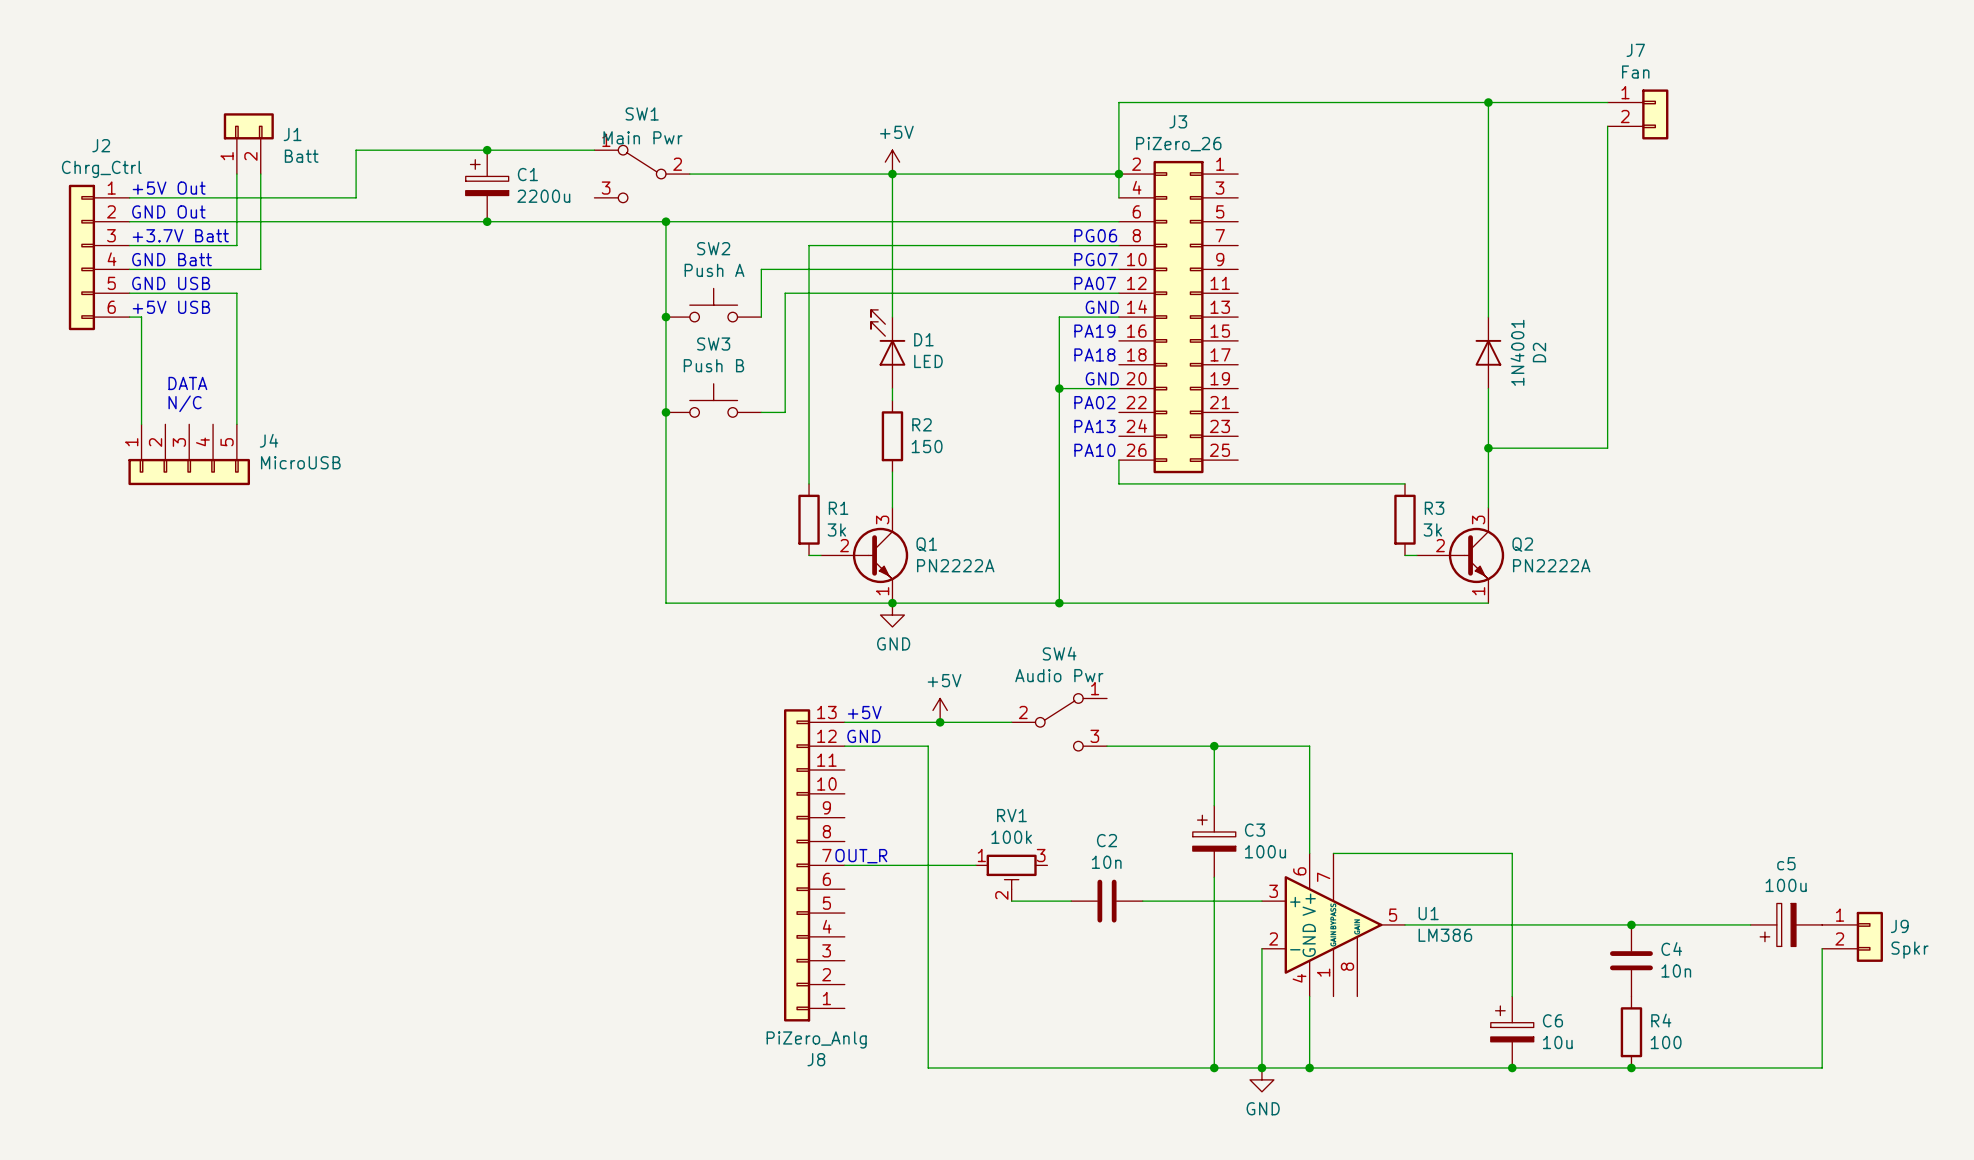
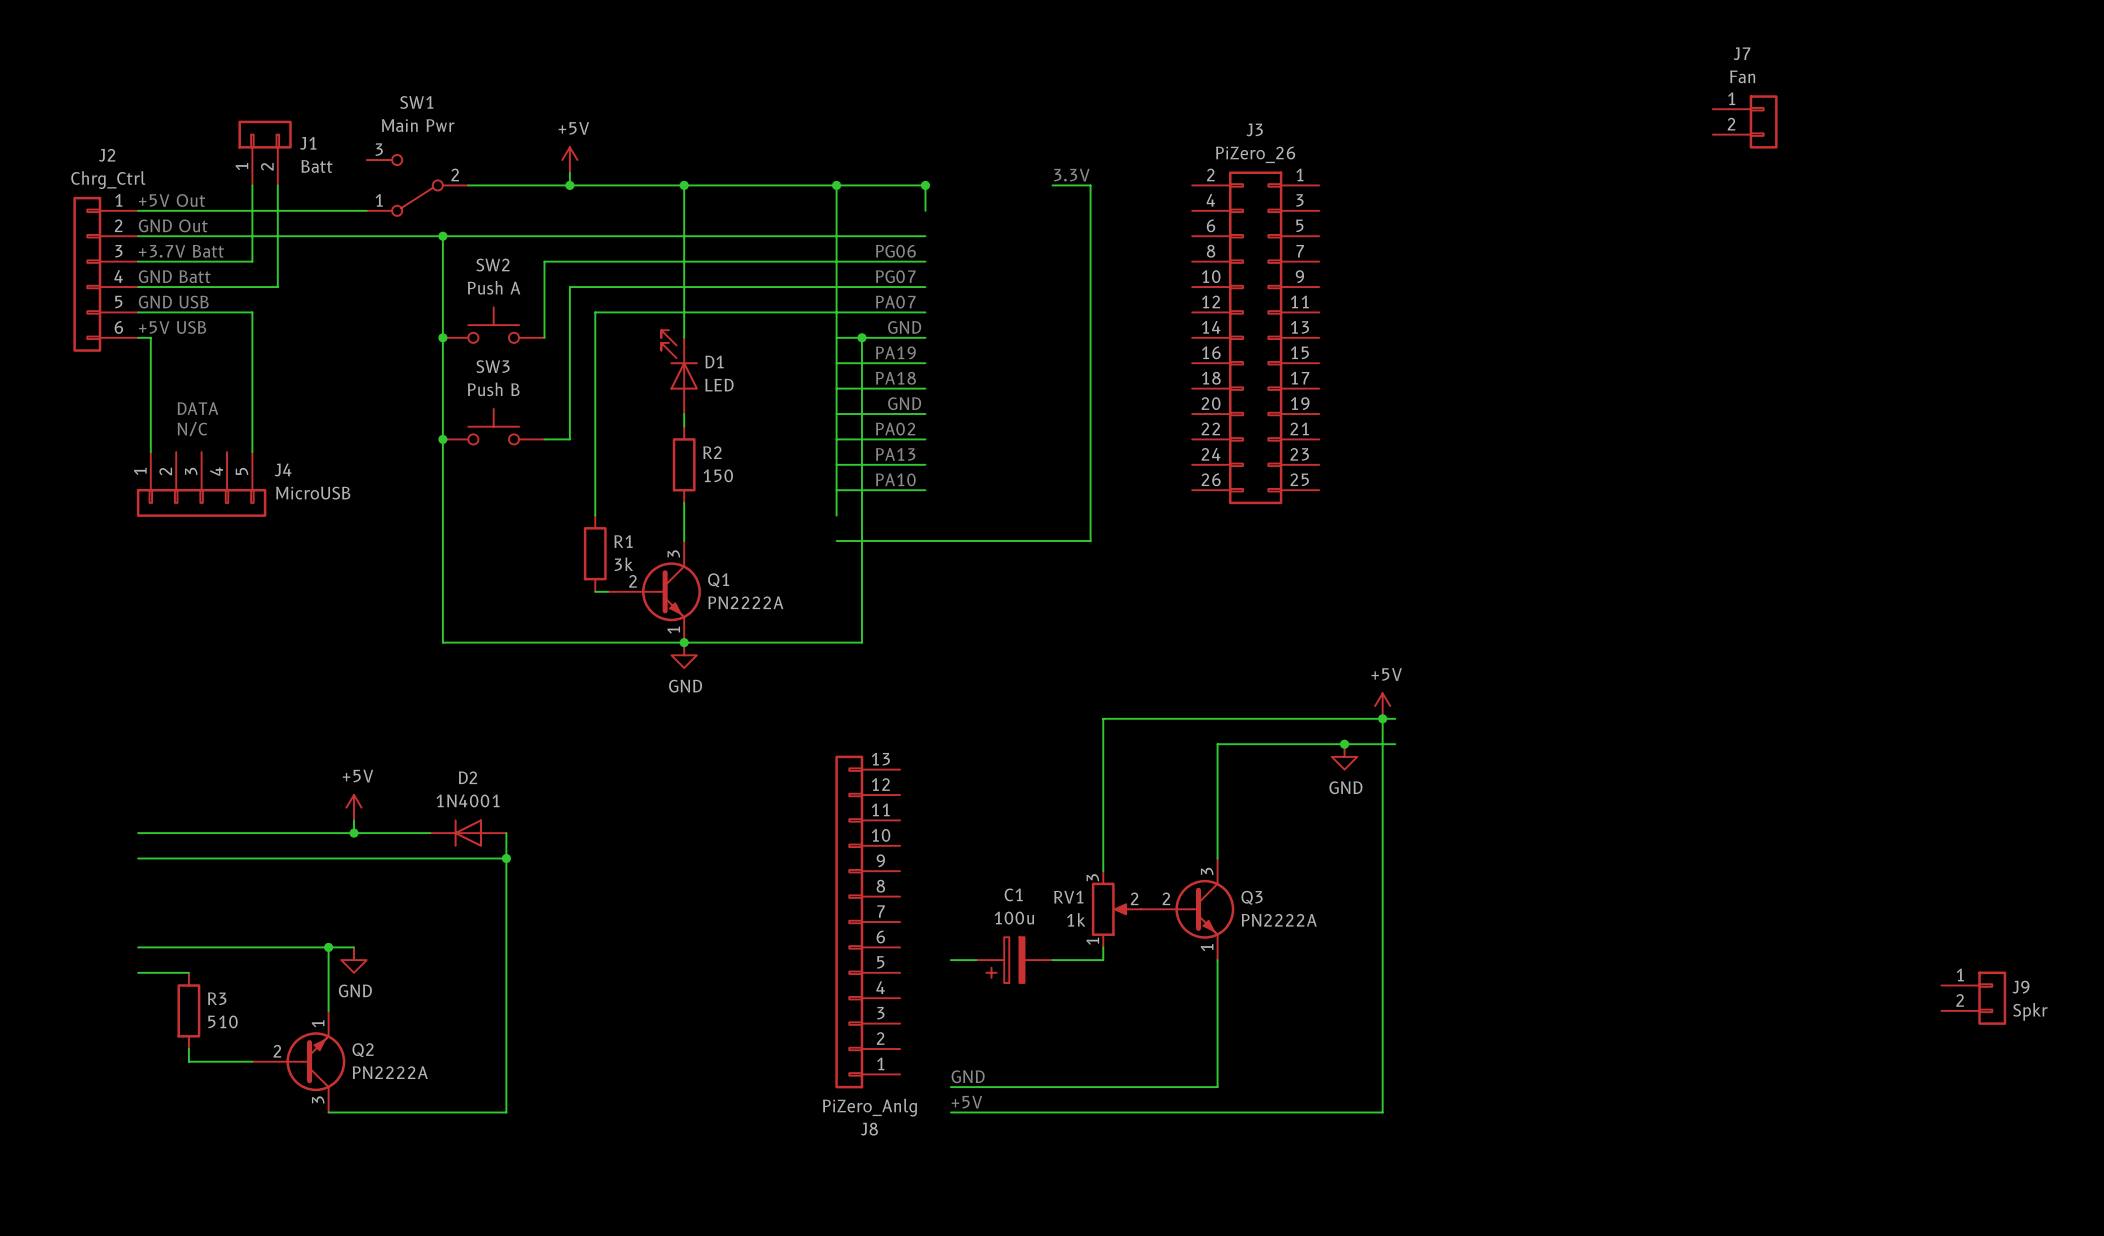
wire: (1488, 102) (1488, 317) -> none
junction: (1488, 102) -> none
wire: (1607, 102) (1118, 102) (1118, 197) -> none
wire: (1607, 126) (1607, 448) (1488, 448) -> none
SW1 value position: Main Pwr (643, 137) -> Main Pwr (418, 125)
junction: (487, 150) -> none
power symbol: none -> +5V (569, 160)
wire: (594, 150) (356, 150) (356, 197) (344, 197) -> none
wire: none -> (569, 172) (569, 185)
power symbol: +5V (892, 162) -> none
text: none -> 3.3V (1071, 175)
wire: none -> (468, 185) (734, 185)
C1 name position: C1 (527, 174) -> C1 (1013, 894)
junction: none -> (569, 185)
wire: none -> (684, 185) (684, 337)
SW1 flip: as is (642, 174) -> up-down (417, 185)
SW1 position: (642, 174) -> (417, 185)
wire: none -> (836, 185) (836, 312) (595, 312) (595, 515)
junction: none -> (836, 185)
wire: (868, 174) (987, 174) -> (925, 185) (925, 210)
wire: (892, 174) (892, 317) -> none
junction position: (892, 174) -> (925, 185)
wire: (1023, 174) (1118, 174) -> (1090, 185) (1090, 541) (836, 541)
junction: (1118, 174) -> none
C1 rotation: 0° (487, 177) -> 90° counterclockwise (1005, 960)
C1 position: (487, 185) -> (1014, 960)
C1 value: 2200u (543, 196) -> 100u (1014, 918)
junction: none -> (442, 236)
junction: (487, 221) -> none
wire: (665, 221) (665, 603) -> (442, 236) (442, 642) (709, 642)
junction position: (665, 221) -> (684, 185)
wire: (868, 221) (1118, 221) -> none
text: none -> PG06 (895, 251)
text: PG06 (1095, 235) -> none
wire: (809, 245) (809, 317) -> (861, 261) (544, 261) (544, 337)
wire: (868, 245) (1118, 245) -> none
text: none -> PG07 (895, 276)
text: PG07 (1096, 259) -> none
wire: (761, 269) (761, 317) -> (811, 287) (569, 287) (569, 439) (544, 439)
wire: (868, 269) (1118, 269) -> none
text: none -> PA07 (895, 302)
text: PA07 (1095, 283) -> none
wire: (868, 293) (1118, 293) -> none
SW2 position: (713, 305) -> (493, 325)
text: none -> GND (904, 327)
text: GND (1102, 307) -> none
junction: none -> (442, 337)
junction: (665, 317) -> none
wire: none -> (836, 337) (925, 337)
junction: none -> (861, 337)
wire: (1118, 317) (1059, 317) (1059, 603) -> none
text: none -> PA19 (895, 352)
text: PA19 (1094, 331) -> none
wire: none -> (836, 363) (925, 363)
D1 position: (888, 349) -> (679, 372)
D2 rotation: 0° (1488, 352) -> 90° counterclockwise (468, 833)
D2 position: (1488, 352) -> (468, 833)
text: none -> PA18 (895, 378)
text: PA18 (1094, 354) -> none
wire: none -> (836, 388) (925, 388)
text: none -> GND (904, 403)
text: GND (1102, 378) -> none
wire: none -> (684, 414) (684, 426)
wire: none -> (836, 414) (925, 414)
wire: (892, 388) (892, 400) -> none
wire: (1059, 388) (1118, 388) -> none
junction: (1059, 388) -> none
wire: (1488, 388) (1488, 507) -> none
SW3 position: (713, 400) -> (493, 426)
text: none -> PA02 (895, 429)
text: PA02 (1094, 402) -> none
junction: none -> (442, 439)
junction: (665, 412) -> none
wire: (761, 412) (785, 412) -> none
wire: none -> (925, 439) (836, 439) (836, 515)
text: none -> PA13 (895, 454)
text: PA13 (1094, 426) -> none
wire: none -> (836, 464) (925, 464)
R2 position: (892, 436) -> (684, 464)
junction: (1488, 448) -> none
text: none -> PA10 (895, 479)
text: PA10 (1094, 450) -> none
wire: none -> (836, 490) (925, 490)
wire: (1118, 460) (1118, 483) (1404, 483) -> none
wire: none -> (684, 502) (684, 541)
wire: (892, 472) (892, 507) -> none
R1 position: (809, 519) -> (595, 553)
R3 position: (1404, 519) -> (188, 1010)
R3 value: 3k (1432, 529) -> 510 (223, 1021)
wire: none -> (595, 591) (607, 591)
wire: (809, 555) (820, 555) -> none
Q1 position: (864, 555) -> (654, 591)
wire: (1404, 555) (1416, 555) -> none
Q2 position: (1460, 555) -> (298, 1061)
Q2 flip: as is (1476, 555) -> up-down (315, 1061)
junction: none -> (684, 642)
wire: (809, 603) (1488, 603) -> (861, 642) (861, 515)
junction: (892, 603) -> none
junction: (1059, 603) -> none
power symbol: none -> GND (684, 655)
power symbol: GND (892, 615) -> none
power symbol: none -> +5V (1382, 706)
wire: none -> (1382, 718) (1382, 1112) (950, 1112)
junction: none -> (1382, 718)
wire: none -> (1395, 718) (1103, 718) (1103, 871)
junction: none -> (1344, 744)
wire: none -> (1395, 744) (1217, 744) (1217, 858)
power symbol: +5V (940, 710) -> none
power symbol: none -> GND (1344, 756)
text: +5V (864, 712) -> none
wire: (844, 722) (1011, 722) -> none
junction: (940, 722) -> none
SW4: Audio Pwr (1059, 722) -> none
text: GND (863, 736) -> none
wire: (844, 746) (928, 746) (928, 1067) (1822, 1067) (1822, 948) -> none
wire: (1107, 746) (1309, 746) (1309, 853) -> none
wire: (1214, 746) (1214, 805) -> none
junction: (1214, 746) -> none
power symbol: none -> +5V (353, 807)
wire: none -> (353, 820) (353, 833)
wire: none -> (138, 833) (430, 833)
junction: none -> (353, 833)
wire: none -> (506, 833) (506, 1112) (328, 1112)
wire: none -> (138, 858) (506, 858)
junction: none -> (506, 858)
RV1 name position: RV1 (1011, 815) -> RV1 (1068, 897)
RV1 value: 100k (1011, 837) -> 1k (1076, 919)
C3: 100u (1214, 841) -> none
Q3: none -> PN2222A (1187, 909)
wire: (1333, 853) (1512, 853) (1512, 996) -> none
RV1 symbol: [975, 854, 1048, 902] -> [1091, 871, 1142, 948]
text: OUT_R (861, 856) -> none
wire: (844, 865) (975, 865) -> none
wire: (1214, 877) (1214, 1067) -> none
wire: none -> (138, 947) (353, 947)
wire: none -> (328, 947) (328, 1010)
junction: none -> (328, 947)
power symbol: none -> GND (353, 960)
wire: none -> (950, 960) (976, 960)
wire: none -> (1052, 960) (1077, 960)
wire: (1035, 901) (1071, 901) -> (1103, 960) (1103, 947)
C2: 10n (1107, 901) -> none
wire: (1142, 901) (1261, 901) -> (1217, 960) (1217, 1087) (950, 1087)
wire: none -> (138, 972) (188, 972)
U1: LM386 (1333, 924) -> none
wire: (1404, 924) (1750, 924) -> none
junction: (1631, 924) -> none
c5: 100u (1786, 924) -> none
wire: (1261, 948) (1261, 1067) -> none
C4: 10n (1631, 960) -> none
wire: none -> (188, 1049) (188, 1061) (252, 1061)
wire: (1309, 996) (1309, 1067) -> none
text: none -> GND (968, 1076)
C6: 10u (1512, 1032) -> none
R4: 100 (1631, 1032) -> none
text: none -> +5V (966, 1102)
junction: (1214, 1067) -> none
junction: (1261, 1067) -> none
junction: (1309, 1067) -> none
junction: (1512, 1067) -> none
junction: (1631, 1067) -> none
power symbol: GND (1261, 1079) -> none

